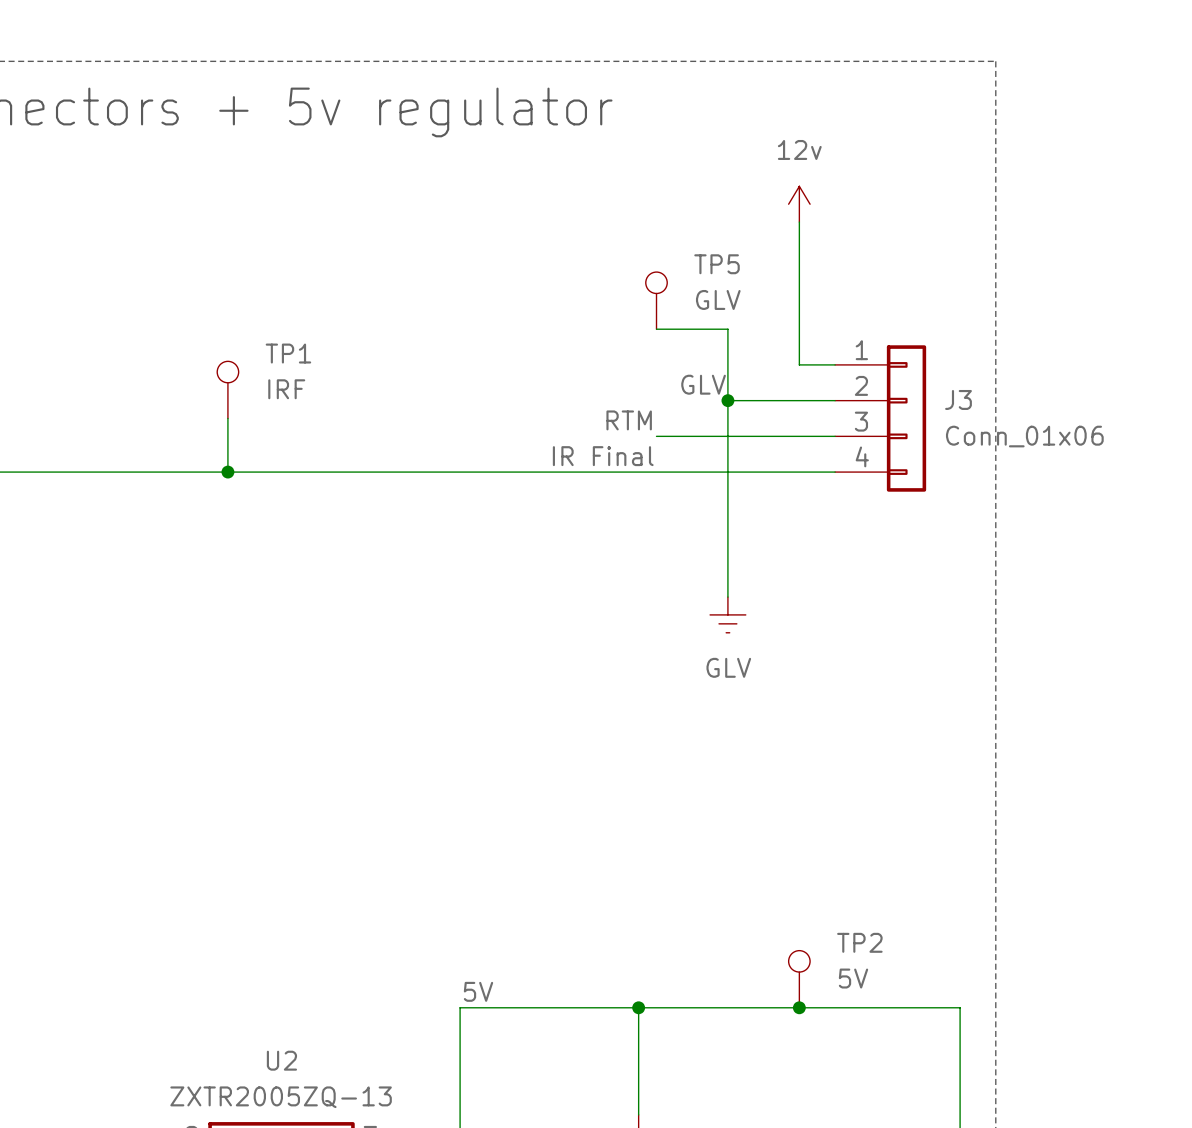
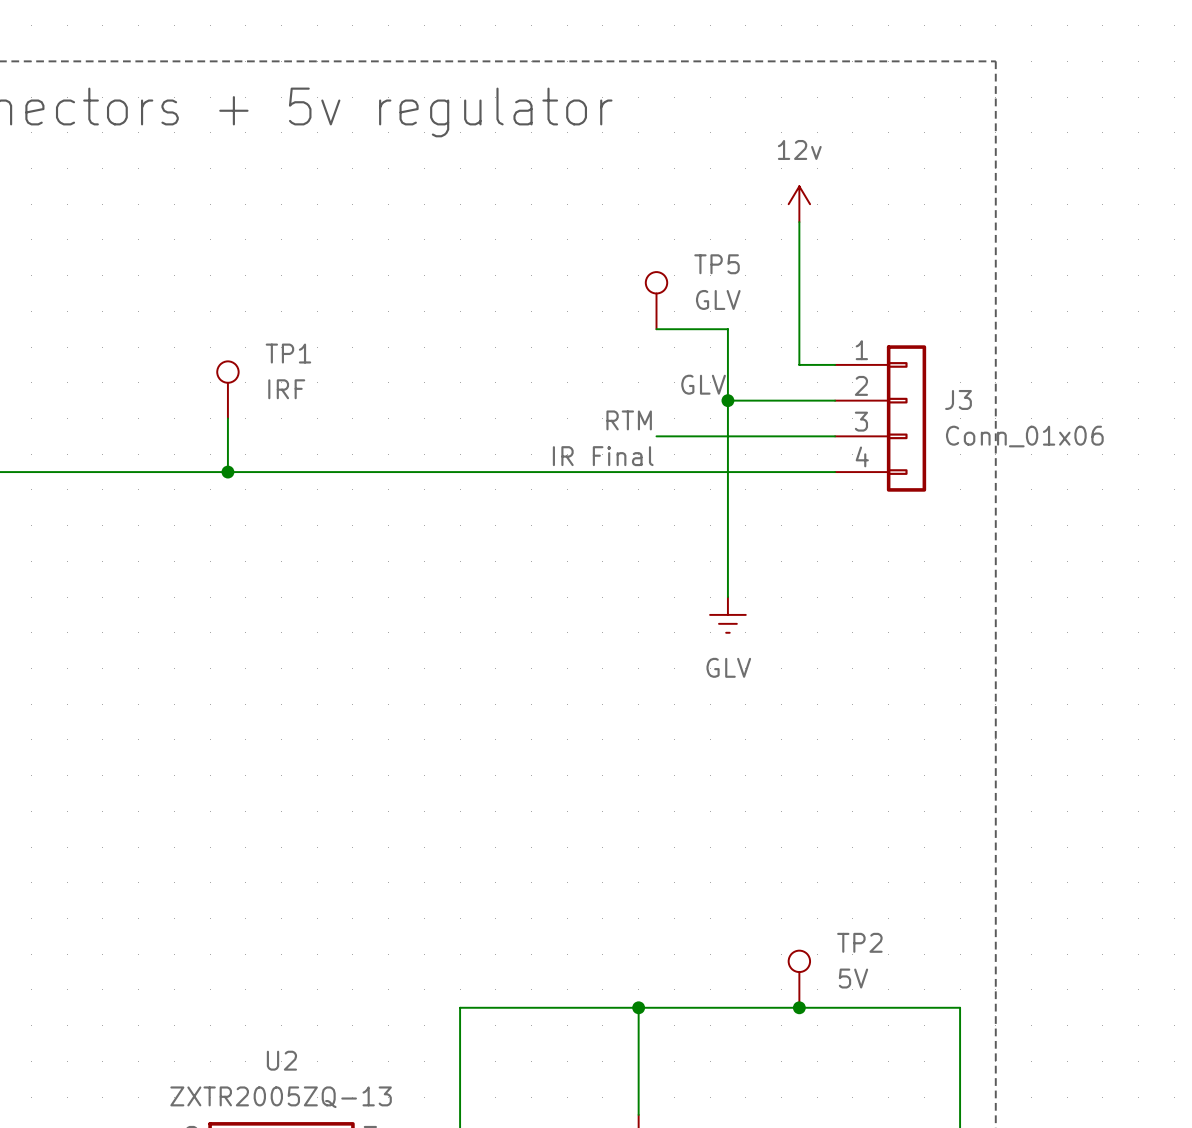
label: 5V (478, 991) -> none

